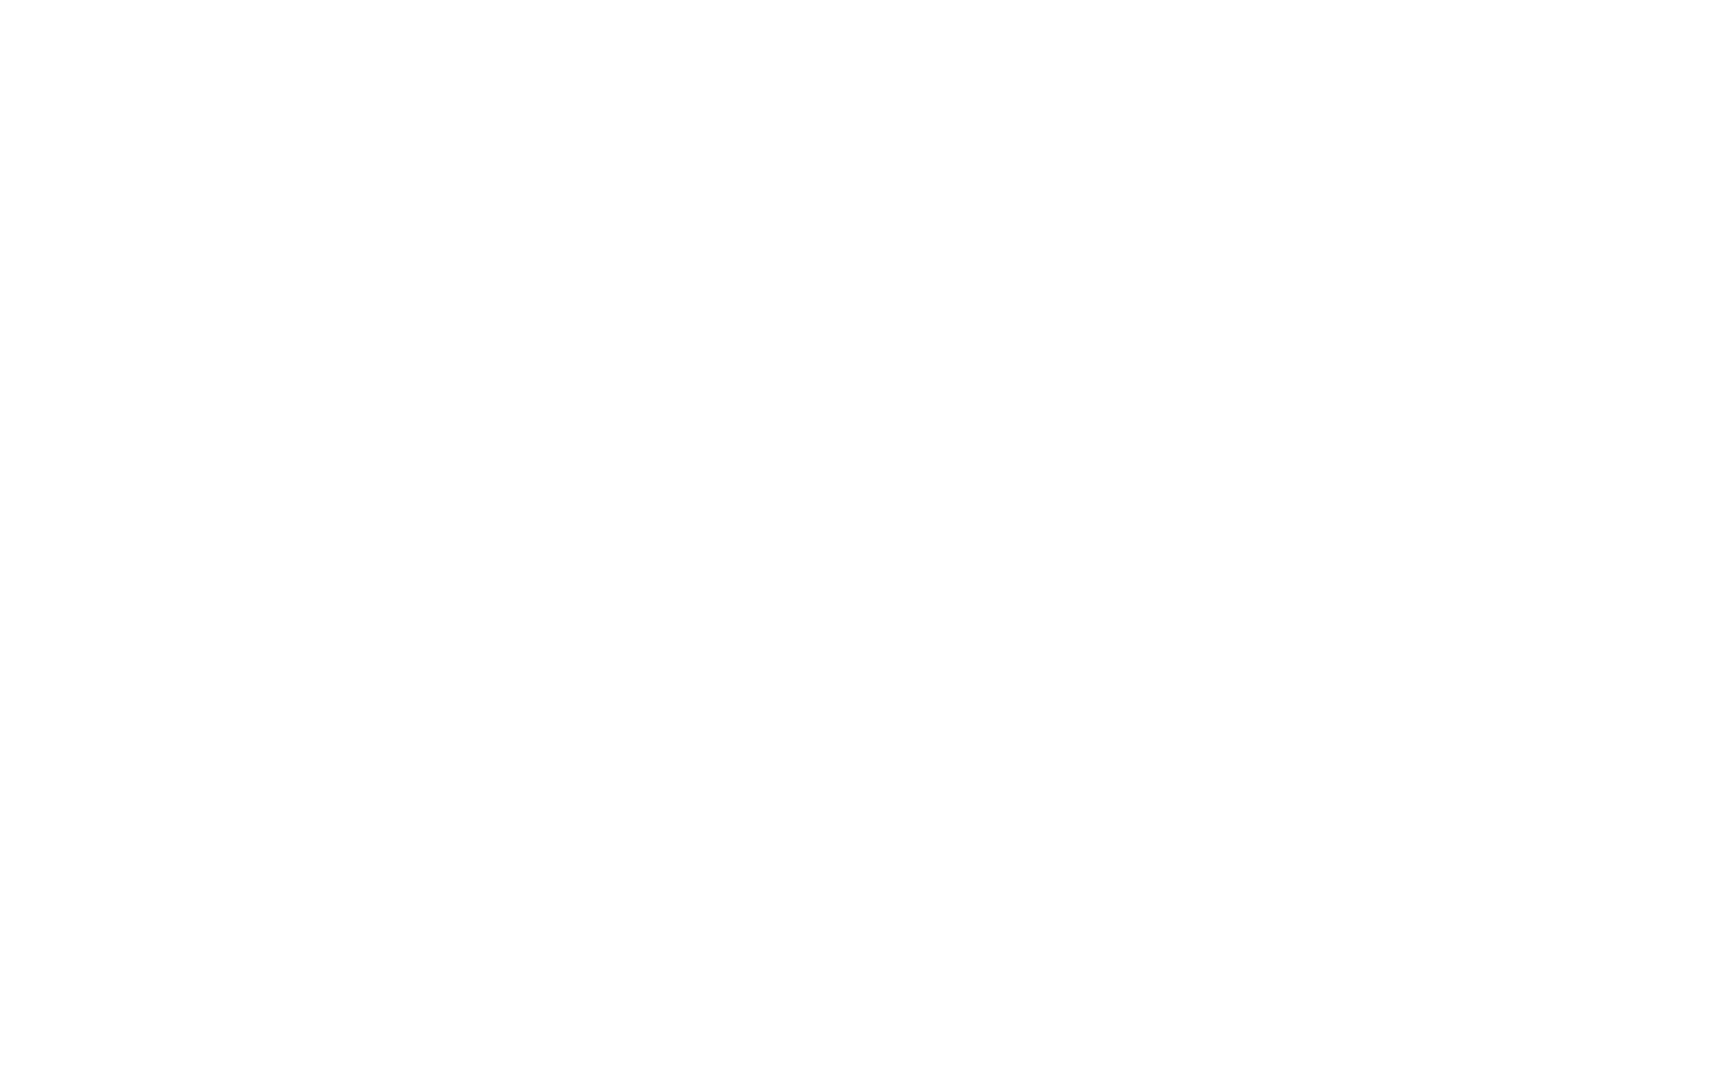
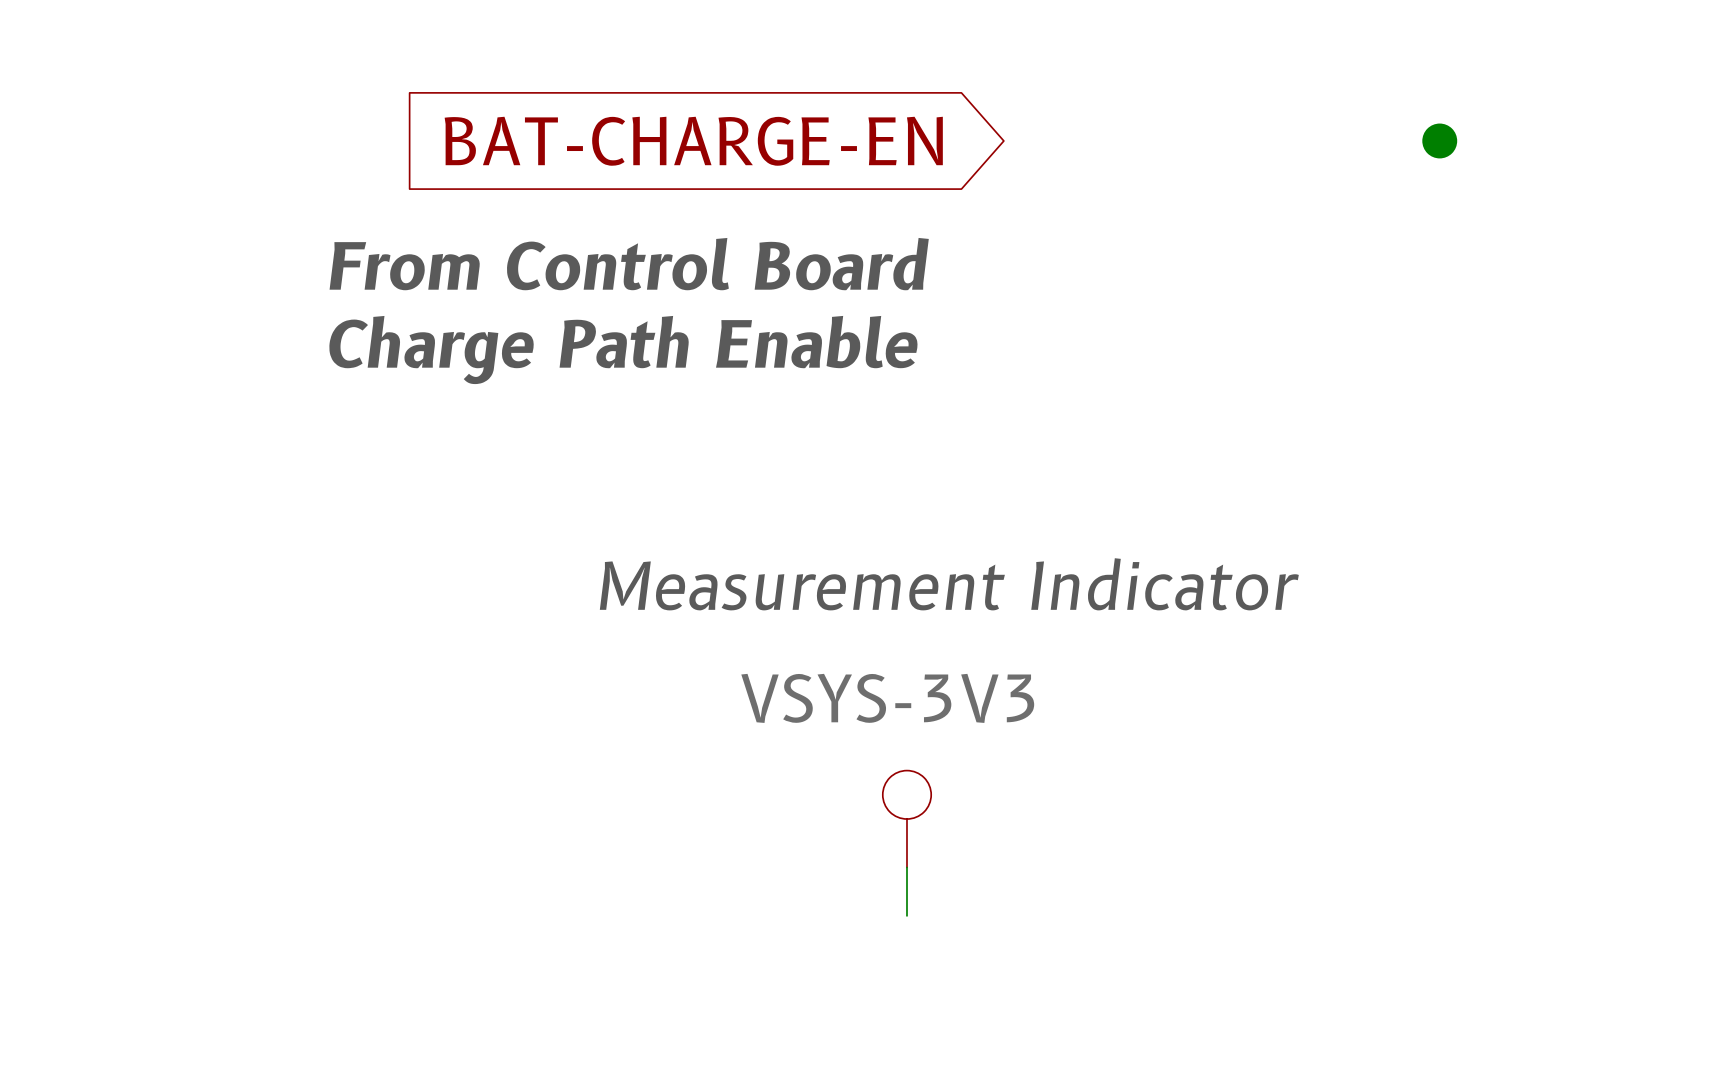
global label: none -> BAT-CHARGE-EN (693, 141)
junction: none -> (1439, 140)
text: none -> From Control Board (629, 264)
text: none -> Charge Path Enable (623, 349)
text: none -> Measurement Indicator (949, 584)
power symbol: none -> VSYS-3V3 (906, 819)
wire: none -> (906, 867) (906, 915)

